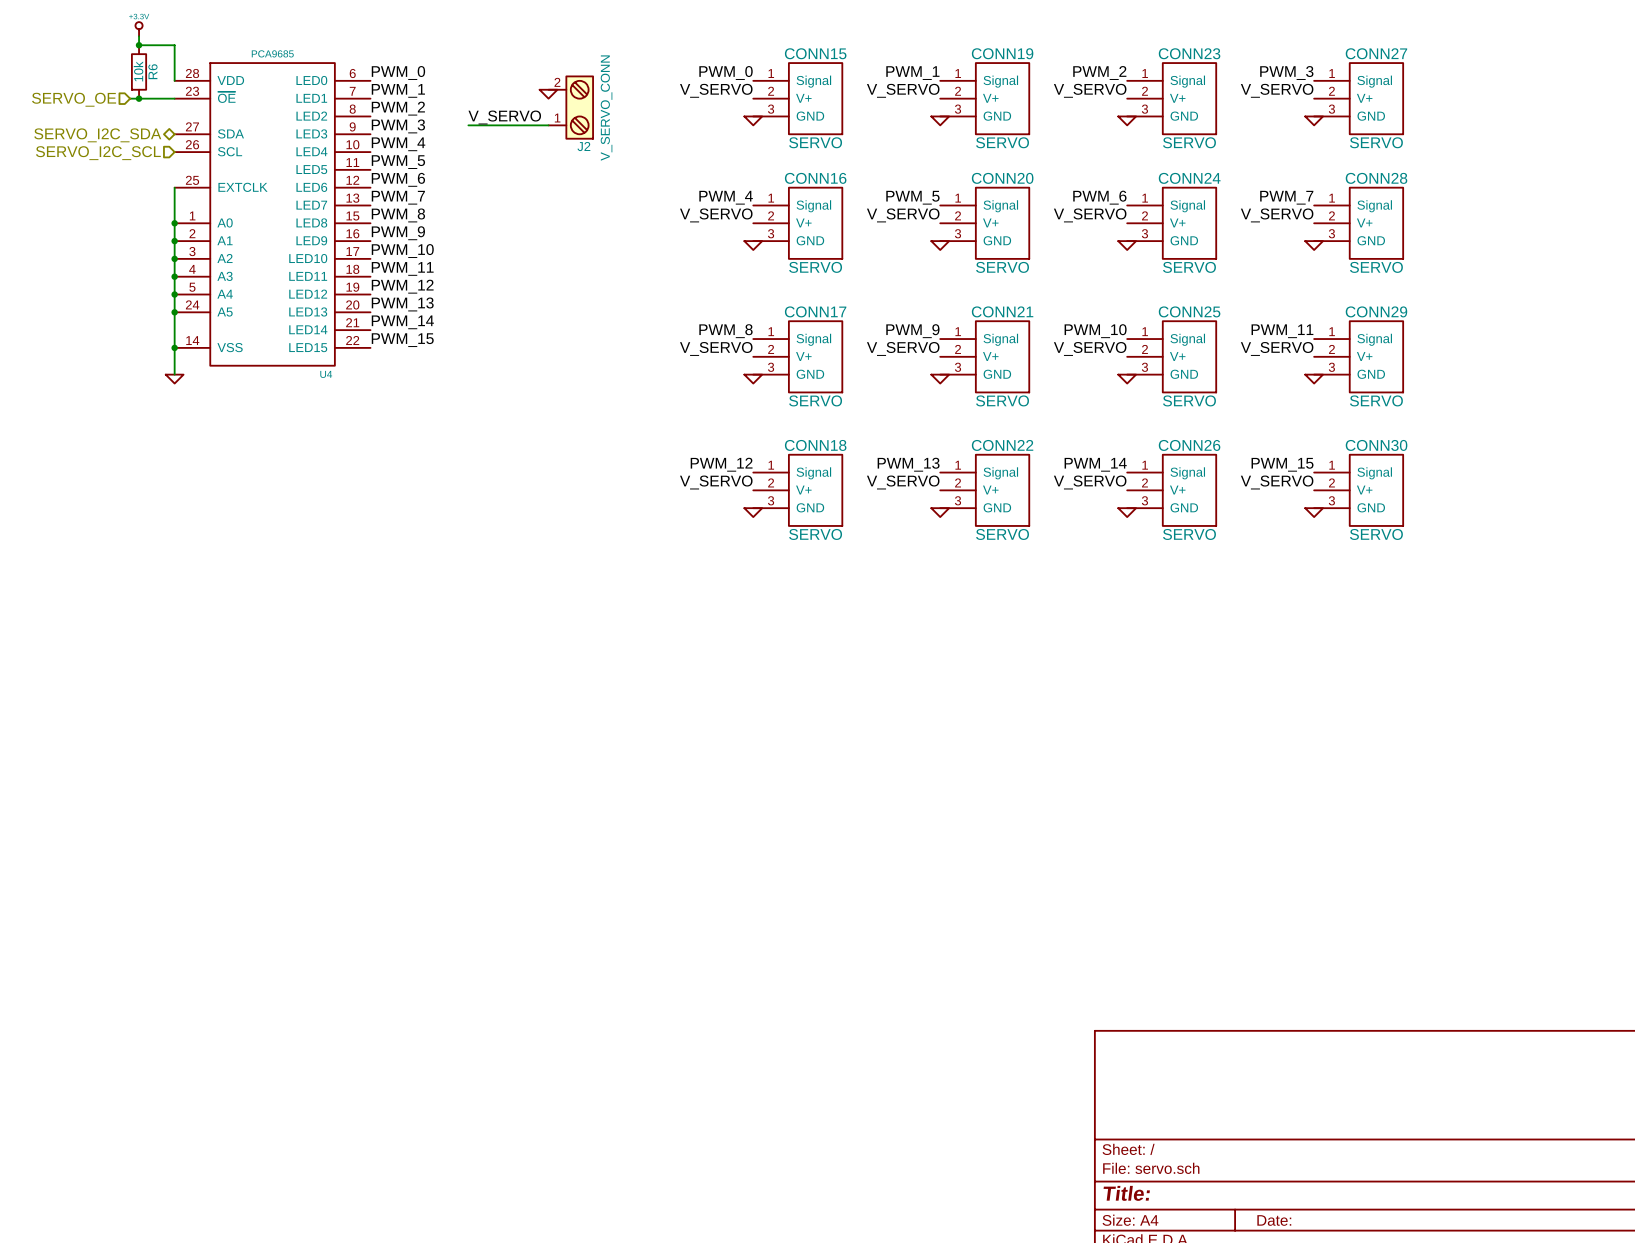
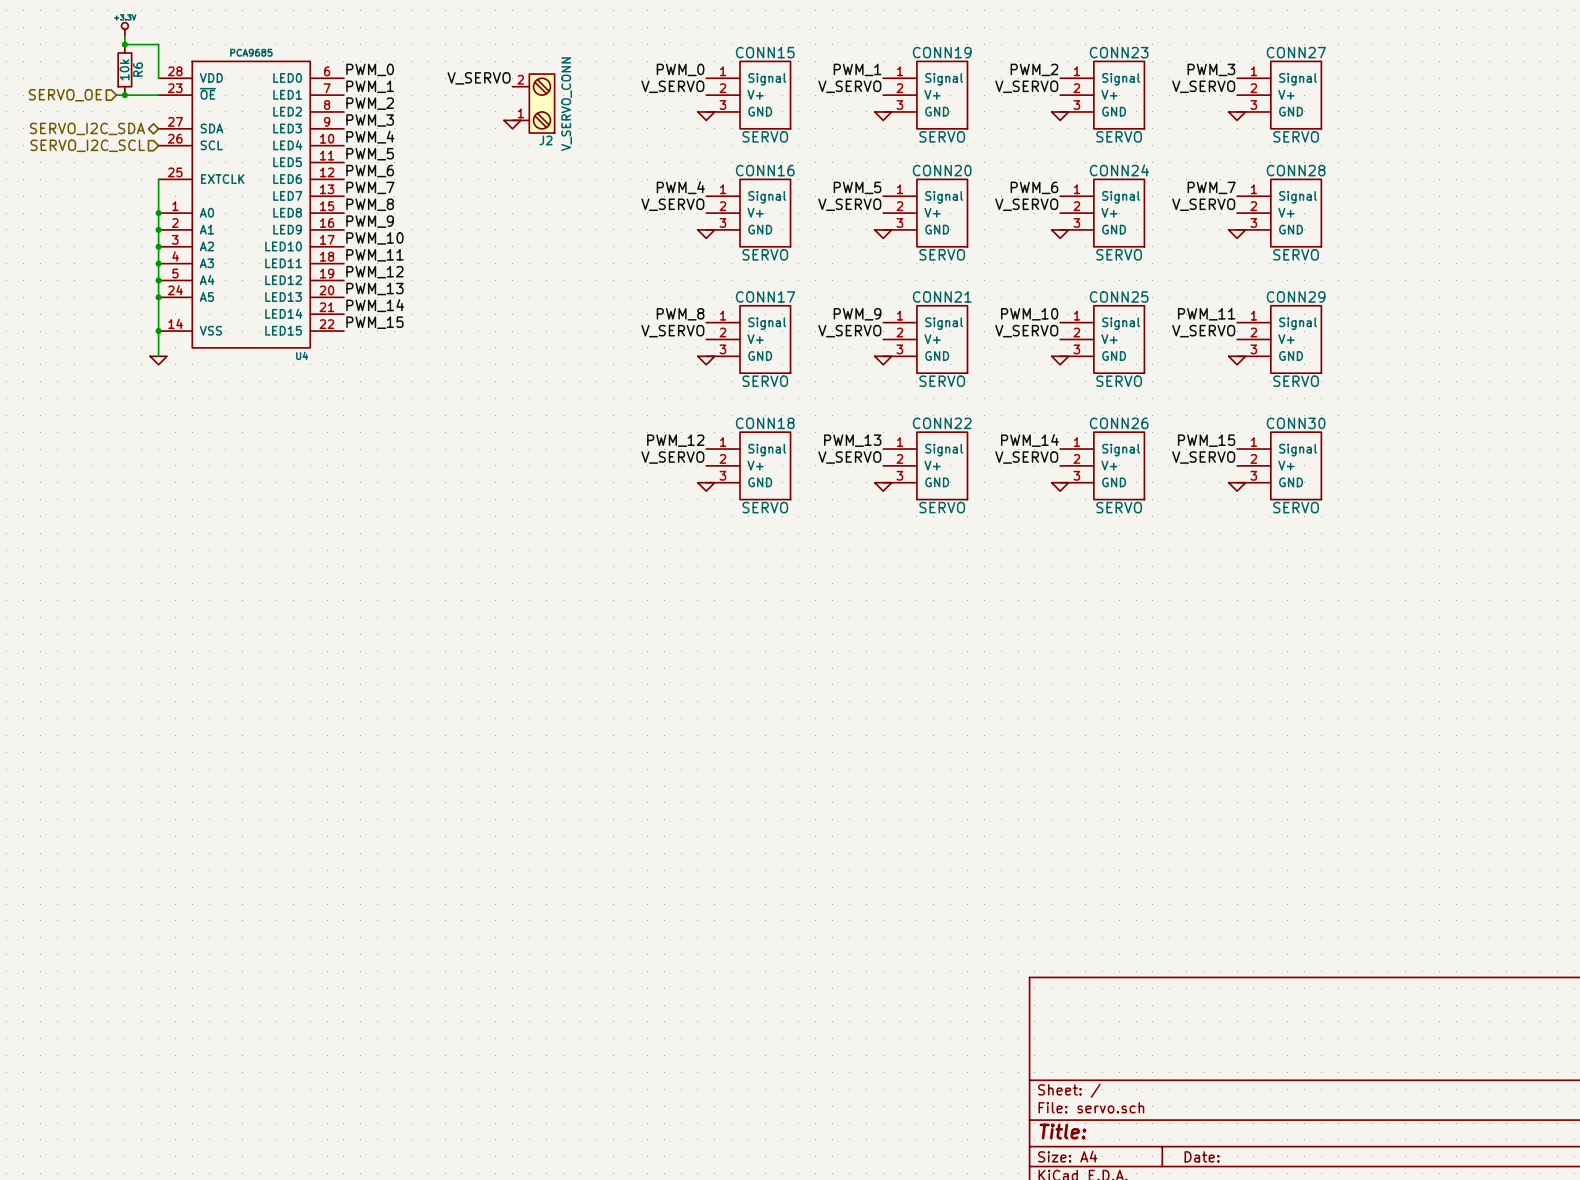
power symbol position: (548, 94) -> (512, 124)
label position: V_SERVO (504, 117) -> V_SERVO (479, 78)
wire: (468, 125) (548, 125) -> none

